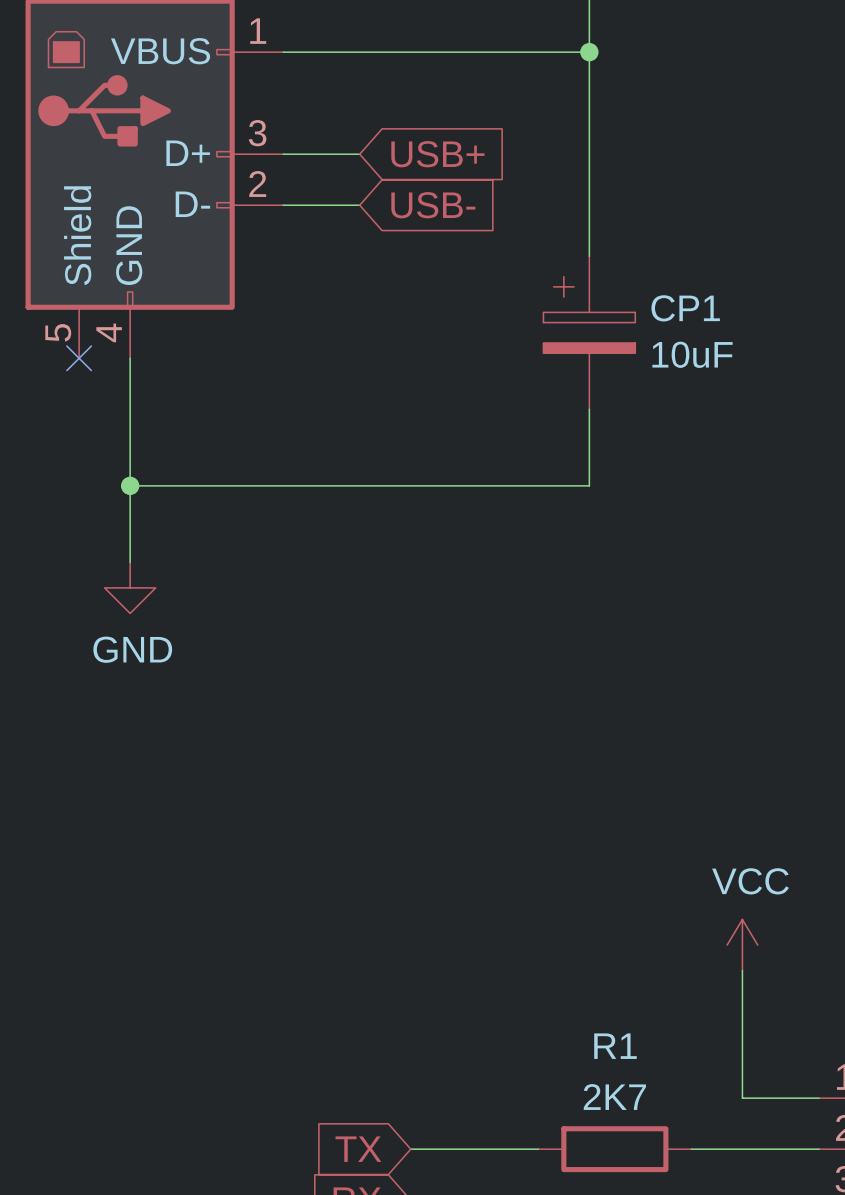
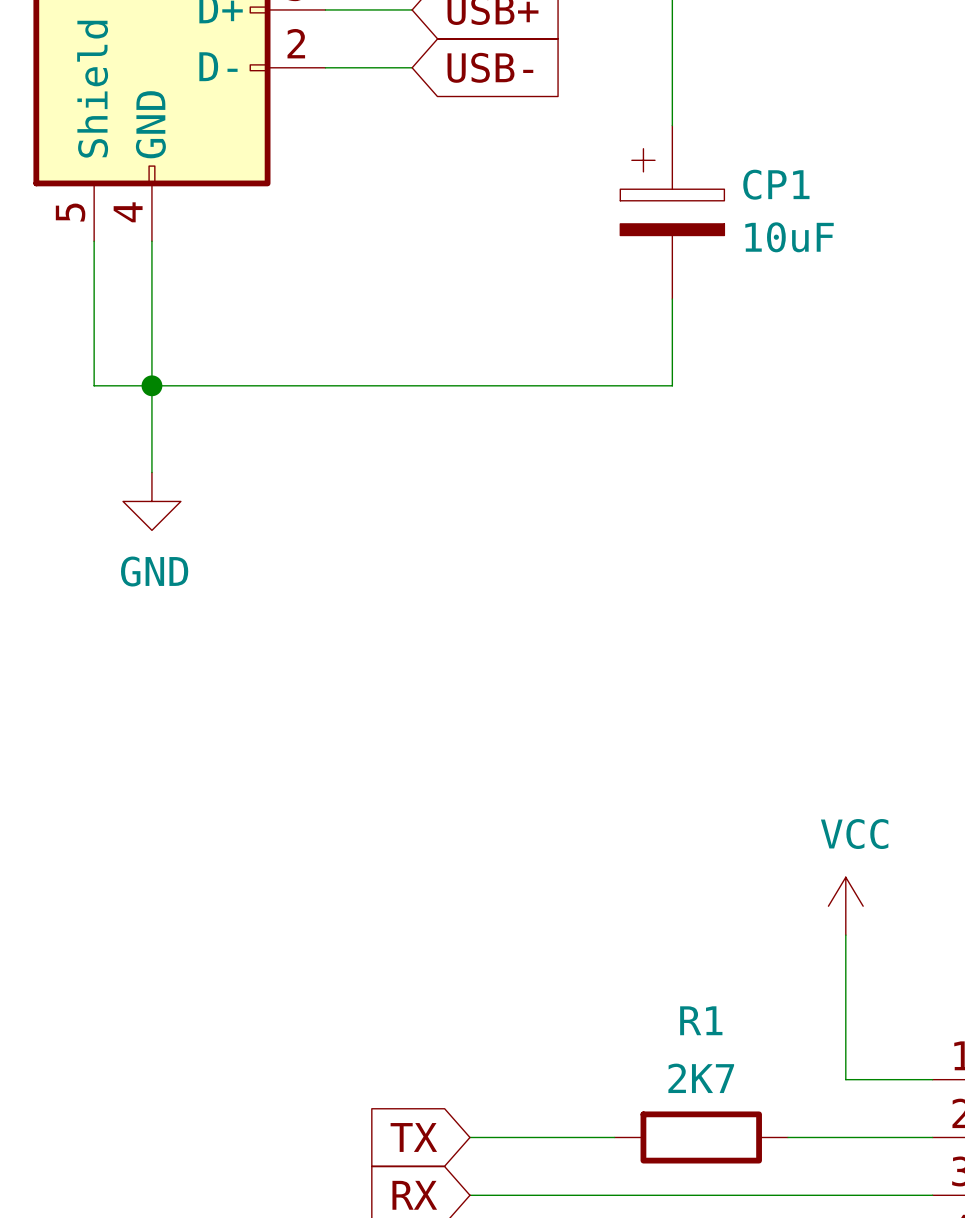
wire: none -> (94, 241) (94, 385) (151, 385)
no-connect mark: (79, 358) -> none

